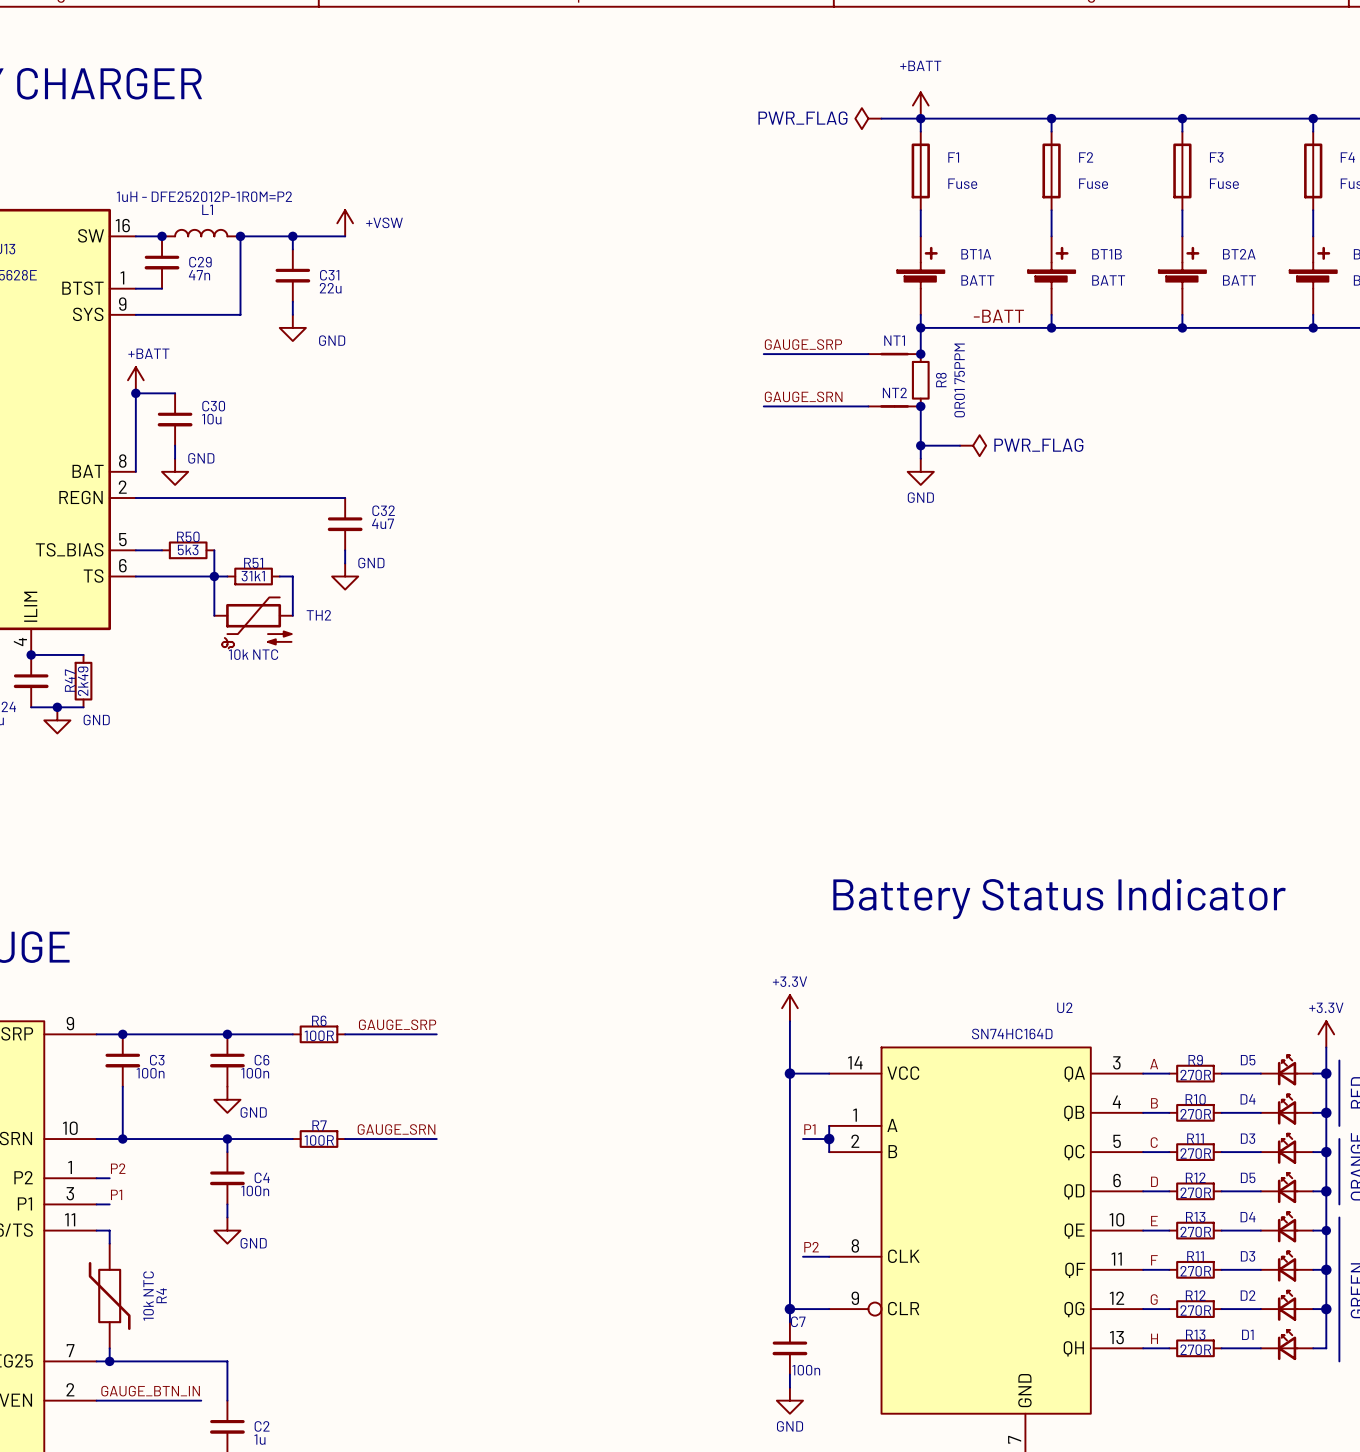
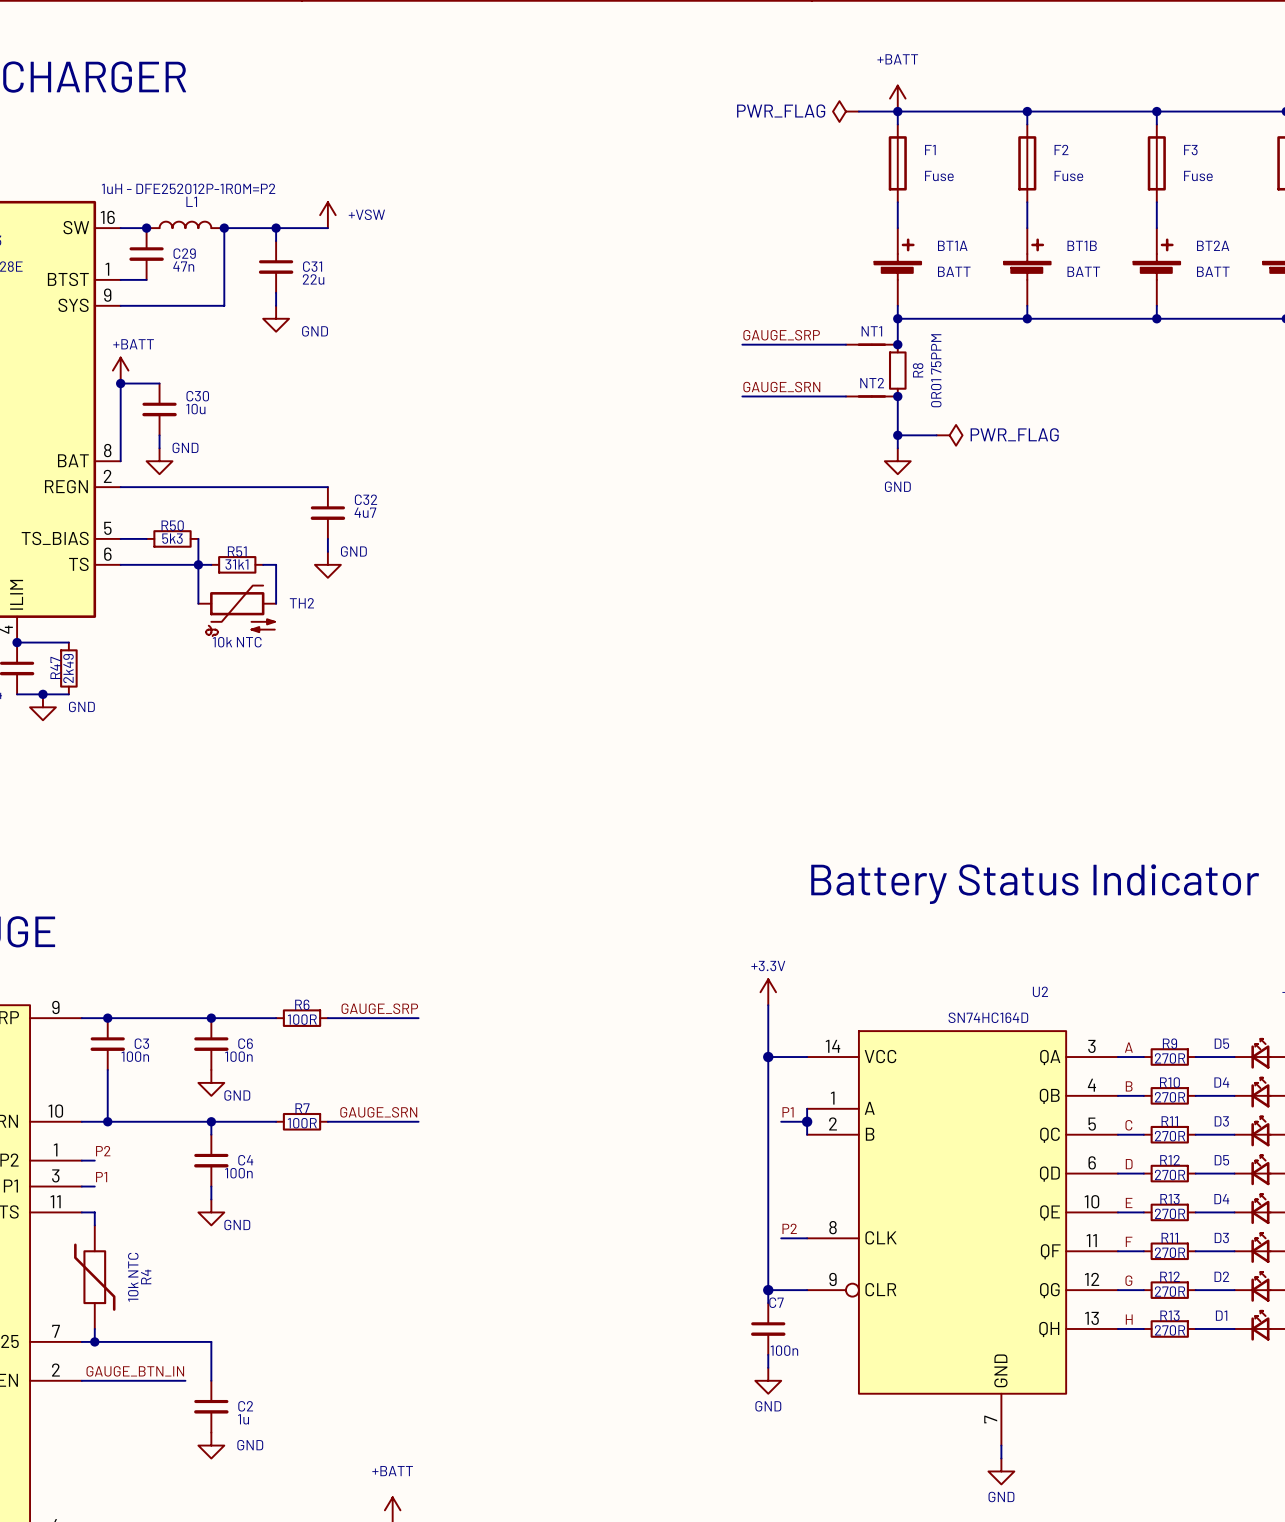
label: -BATT (998, 316) -> none

